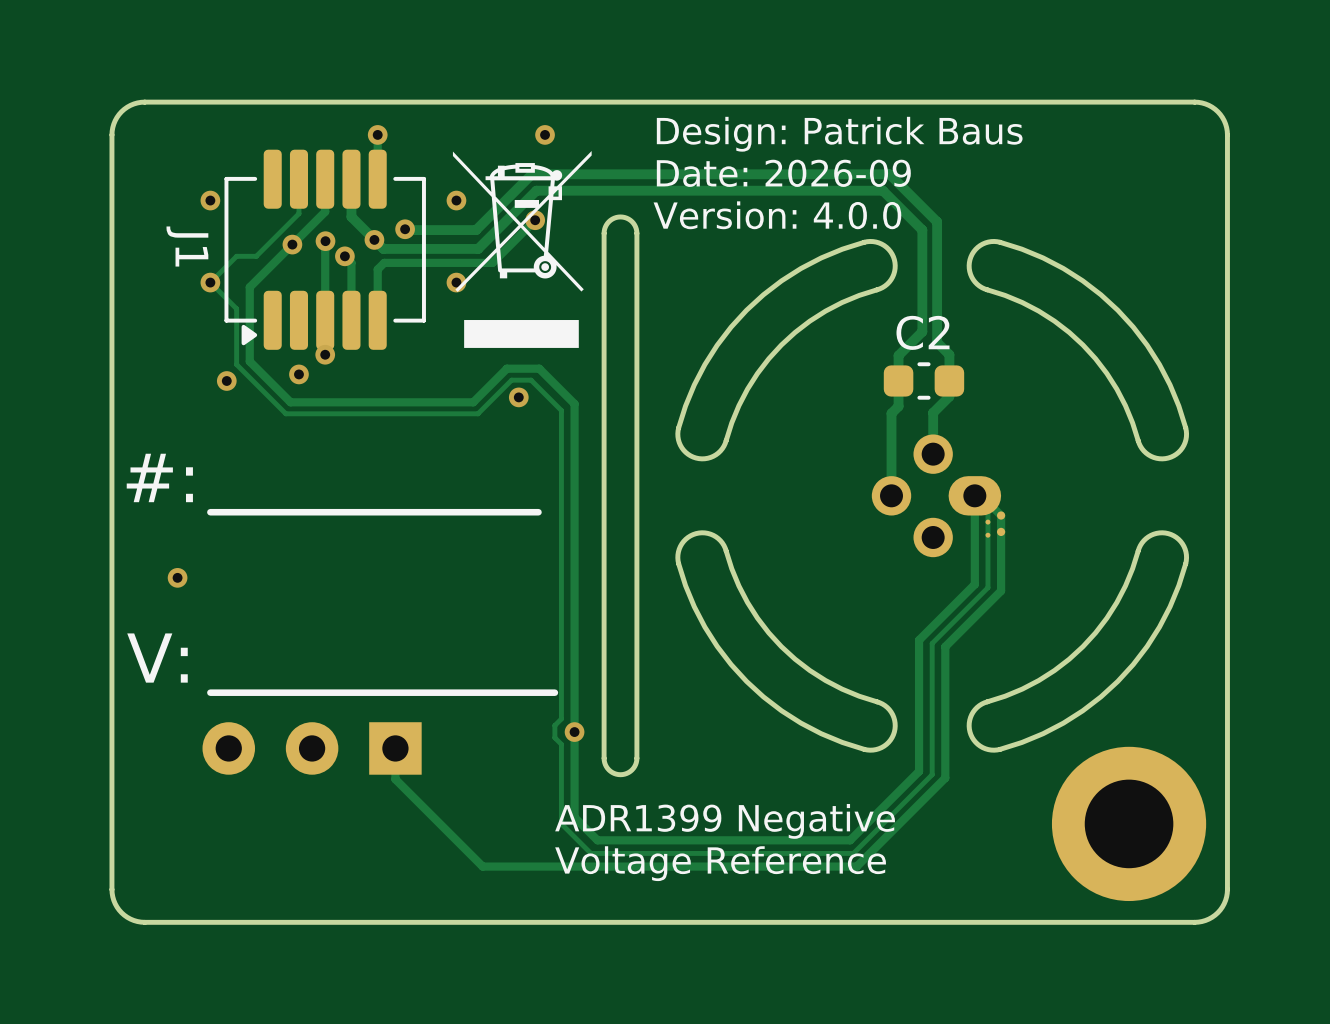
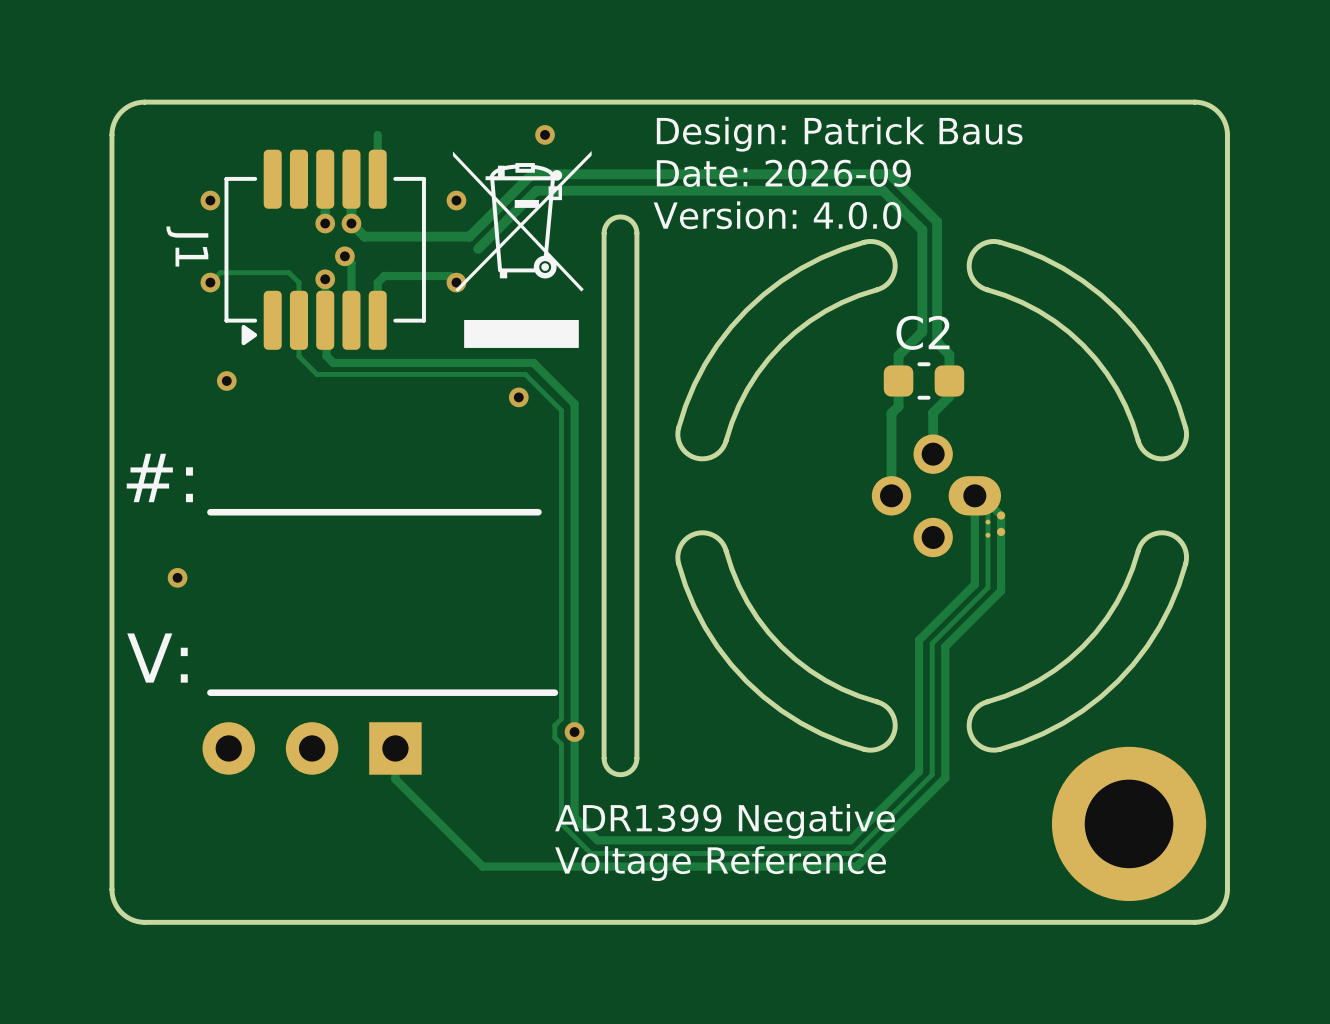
via: (377, 134) -> none
track: (298, 179) (298, 213) (256, 256) (236, 256) (220, 272) -> none
track: (325, 211) (249, 287) (249, 361) (290, 402) (473, 402) (506, 368) (539, 368) -> (326, 336) (326, 356) (333, 362) (533, 362) (539, 368)
track: (351, 216) (383, 248) (478, 248) -> (351, 216) (351, 223) (364, 236) (469, 236) (476, 230)
track: (535, 220) (492, 262) (384, 262) (377, 269) (377, 282) -> (456, 282) (449, 276) (384, 276) (377, 282)
via: (535, 220) -> none
via: none -> (351, 223)
track: (405, 229) (476, 230) -> none
via: (405, 229) -> none
via: (374, 239) -> none
via position: (325, 241) -> (325, 223)
via: (292, 244) -> none
track: (325, 249) (325, 279) -> none
via: none -> (325, 279)
track: (210, 282) (236, 308) (236, 364) (285, 413) (478, 413) (511, 380) (531, 380) -> (220, 272) (289, 272) (298, 282) (298, 356) (317, 374) (525, 374) (531, 380)
via: (325, 354) -> none
via: (298, 374) -> none

